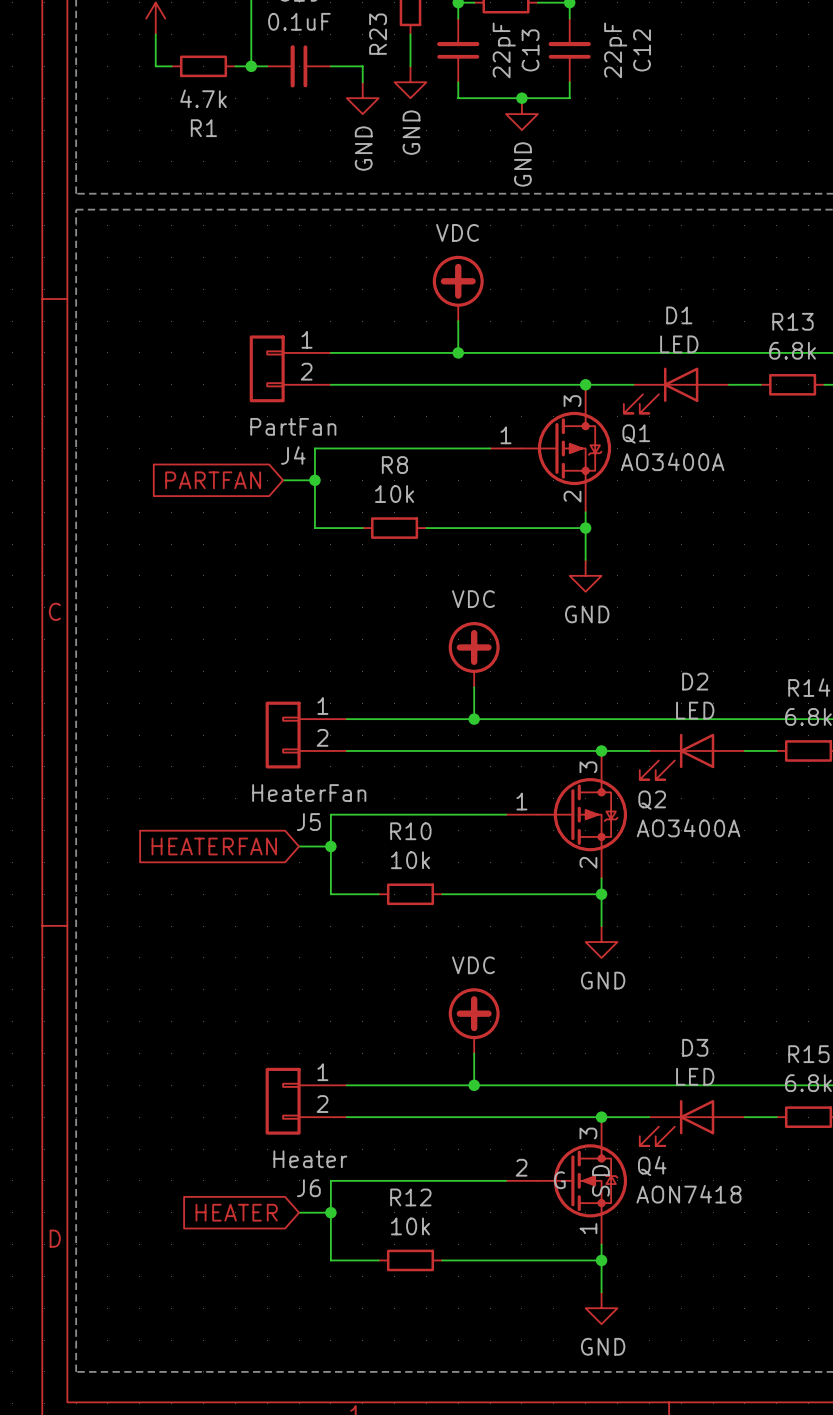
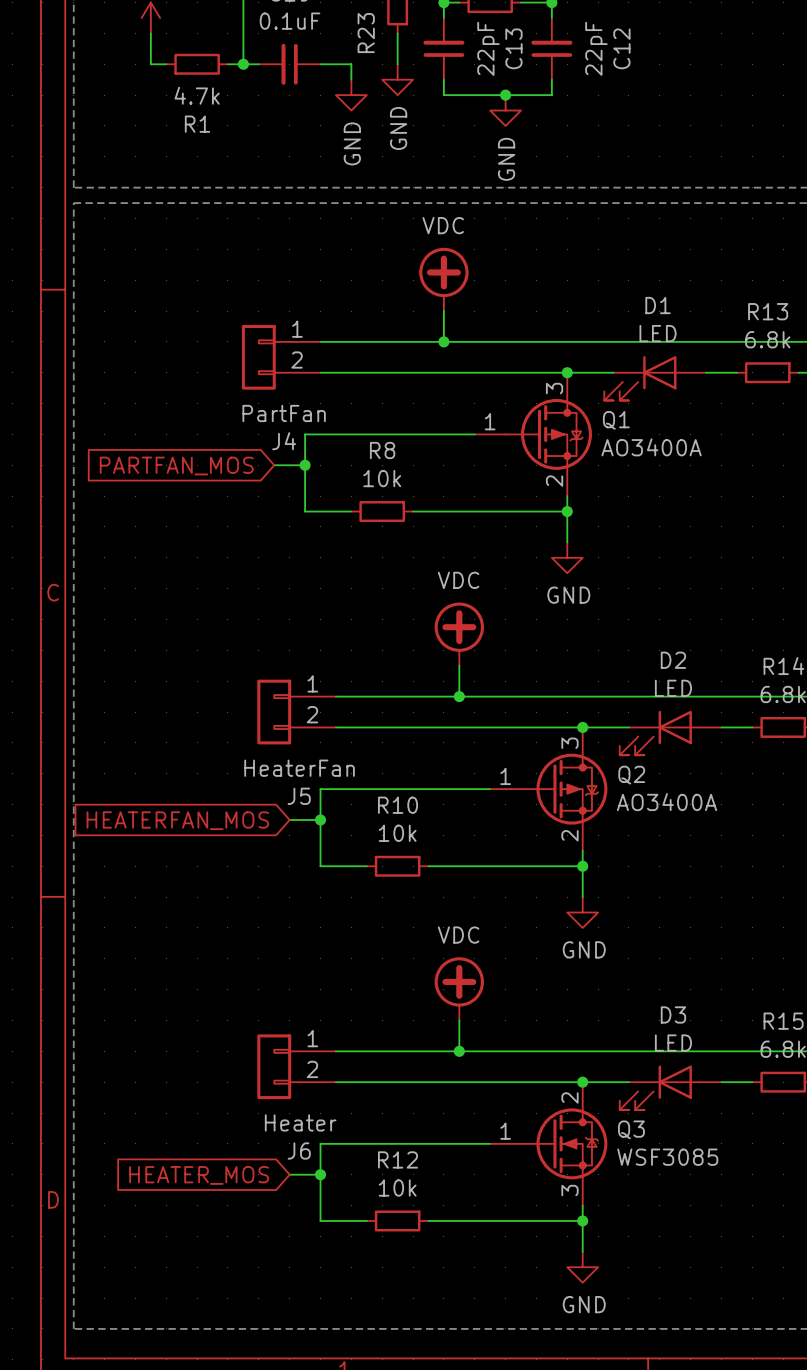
global label: PARTFAN (213, 480) -> PARTFAN_MOS (176, 466)
global label: HEATERFAN (214, 846) -> HEATERFAN_MOS (177, 820)
Q4 pin number: 3 (588, 1133) -> 2 (569, 1097)
Q4 name: Q4 (652, 1165) -> Q3 (631, 1129)
Q4 pin number: 2 (521, 1167) -> 1 (505, 1131)
Q4 pin name: D (600, 1170) -> none
Q4 pin name: G (559, 1180) -> none
Q4 pin name: S (600, 1191) -> none
Q4 value: AON7418 (689, 1194) -> WSF3085 (667, 1157)
global label: HEATER (236, 1212) -> HEATER_MOS (199, 1175)
Q4 pin number: 1 (588, 1228) -> 3 (569, 1190)

